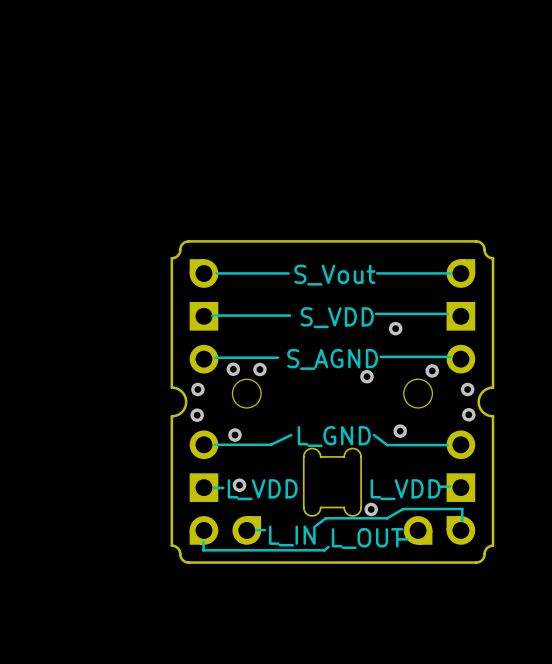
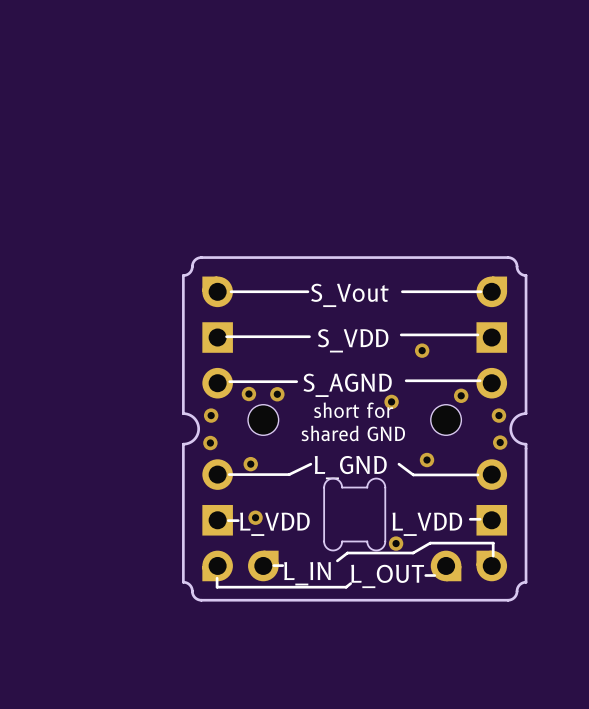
text: none -> short for (353, 410)
text: none -> shared GND (353, 433)

